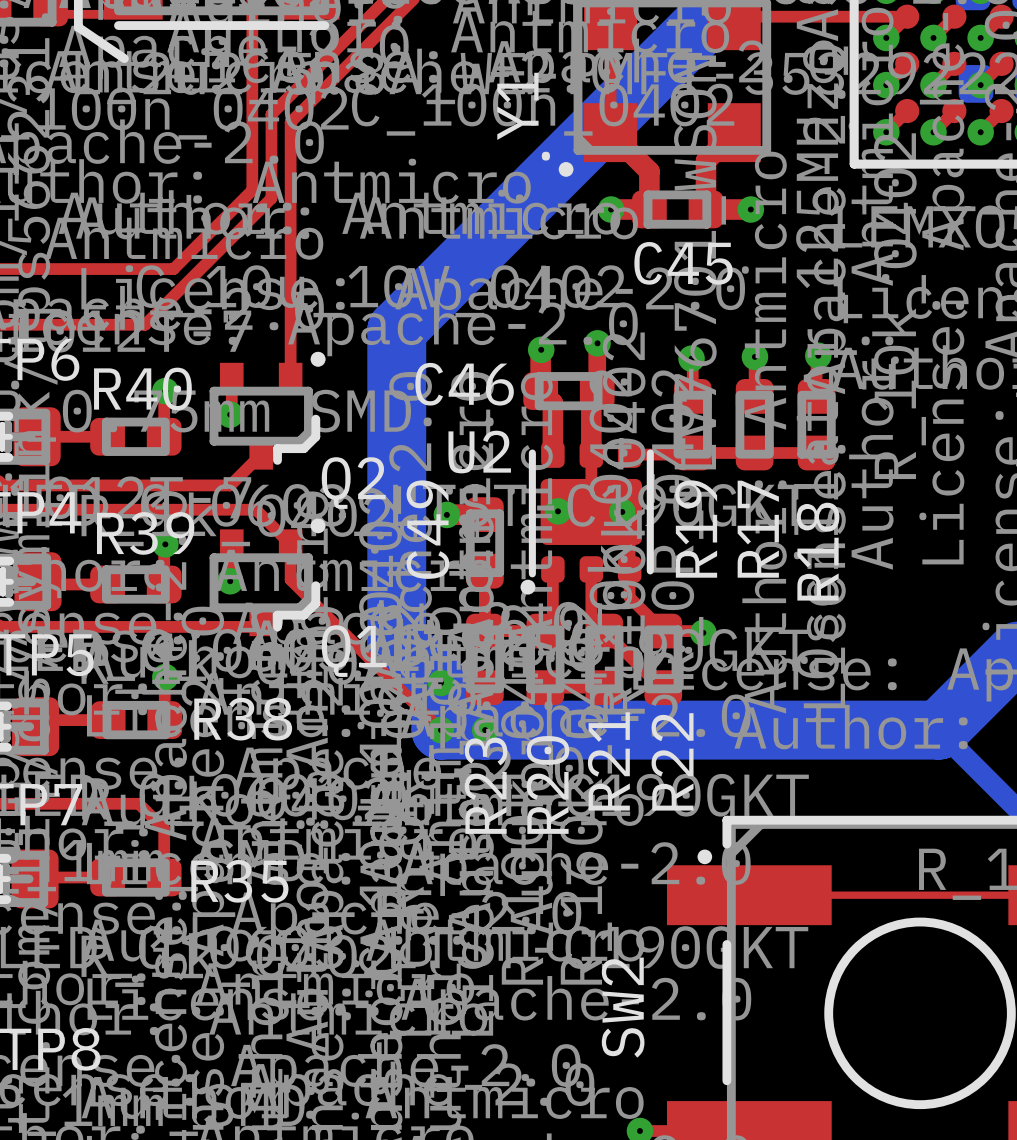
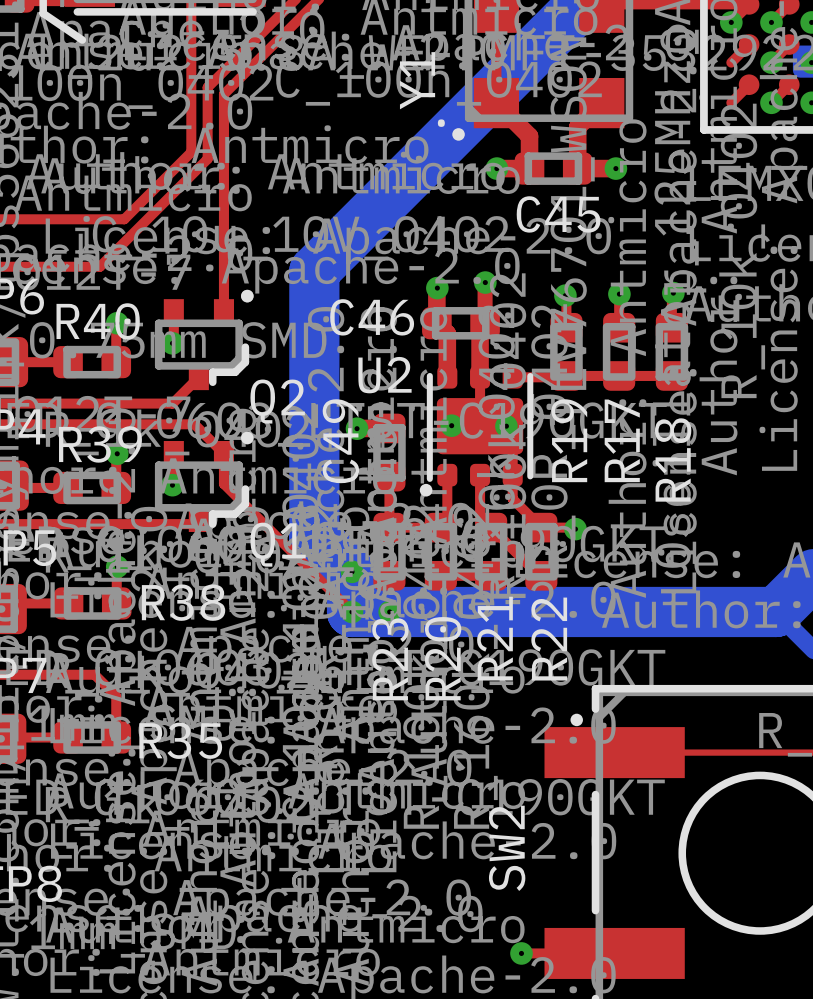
via: (886, 85) -> none
via: (886, 132) -> none

